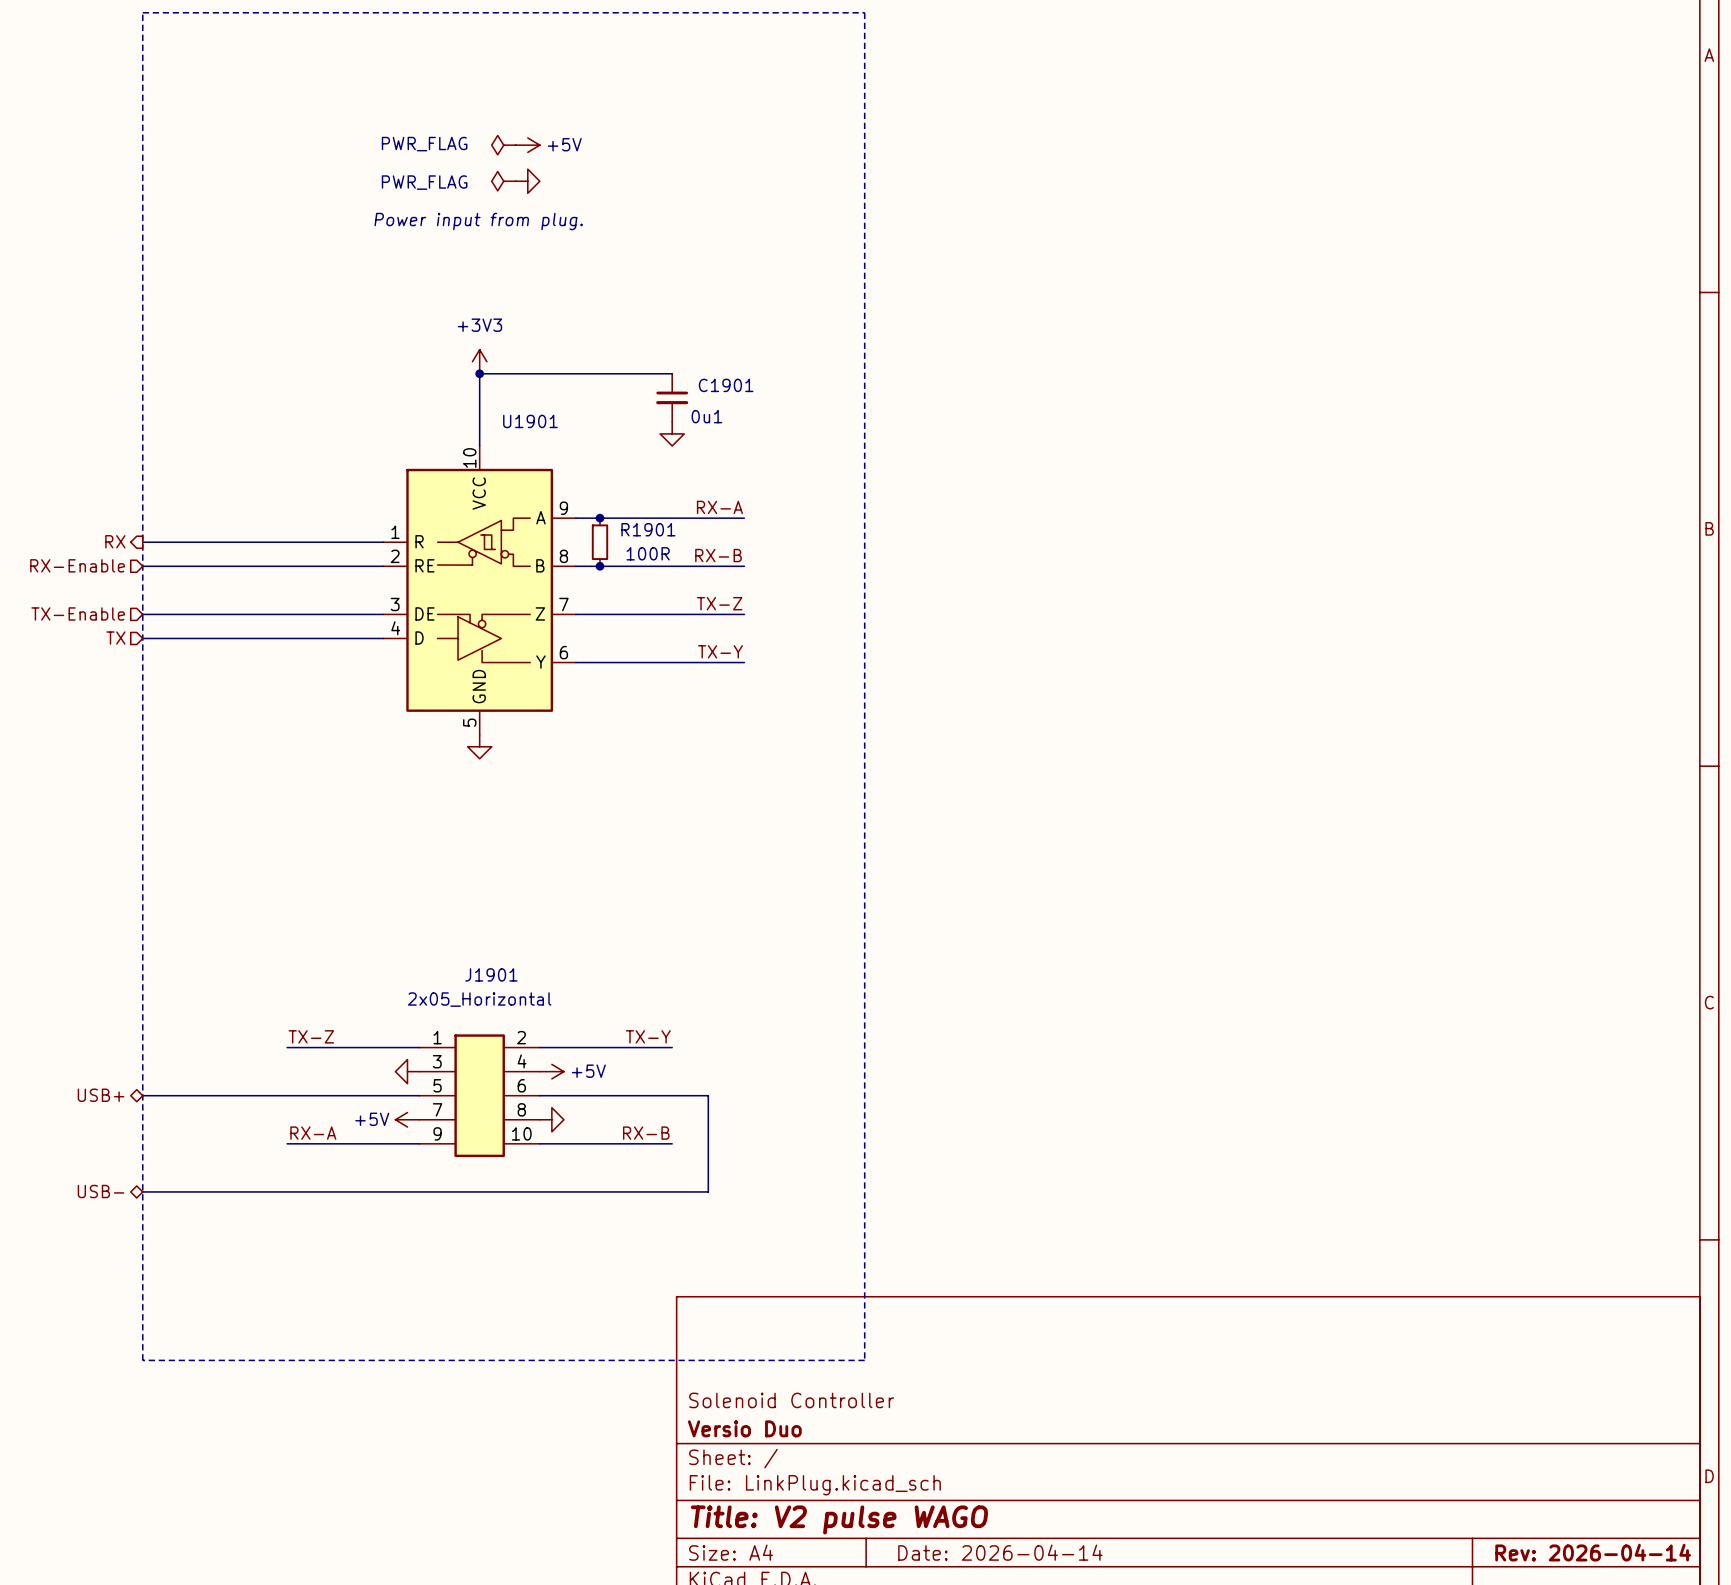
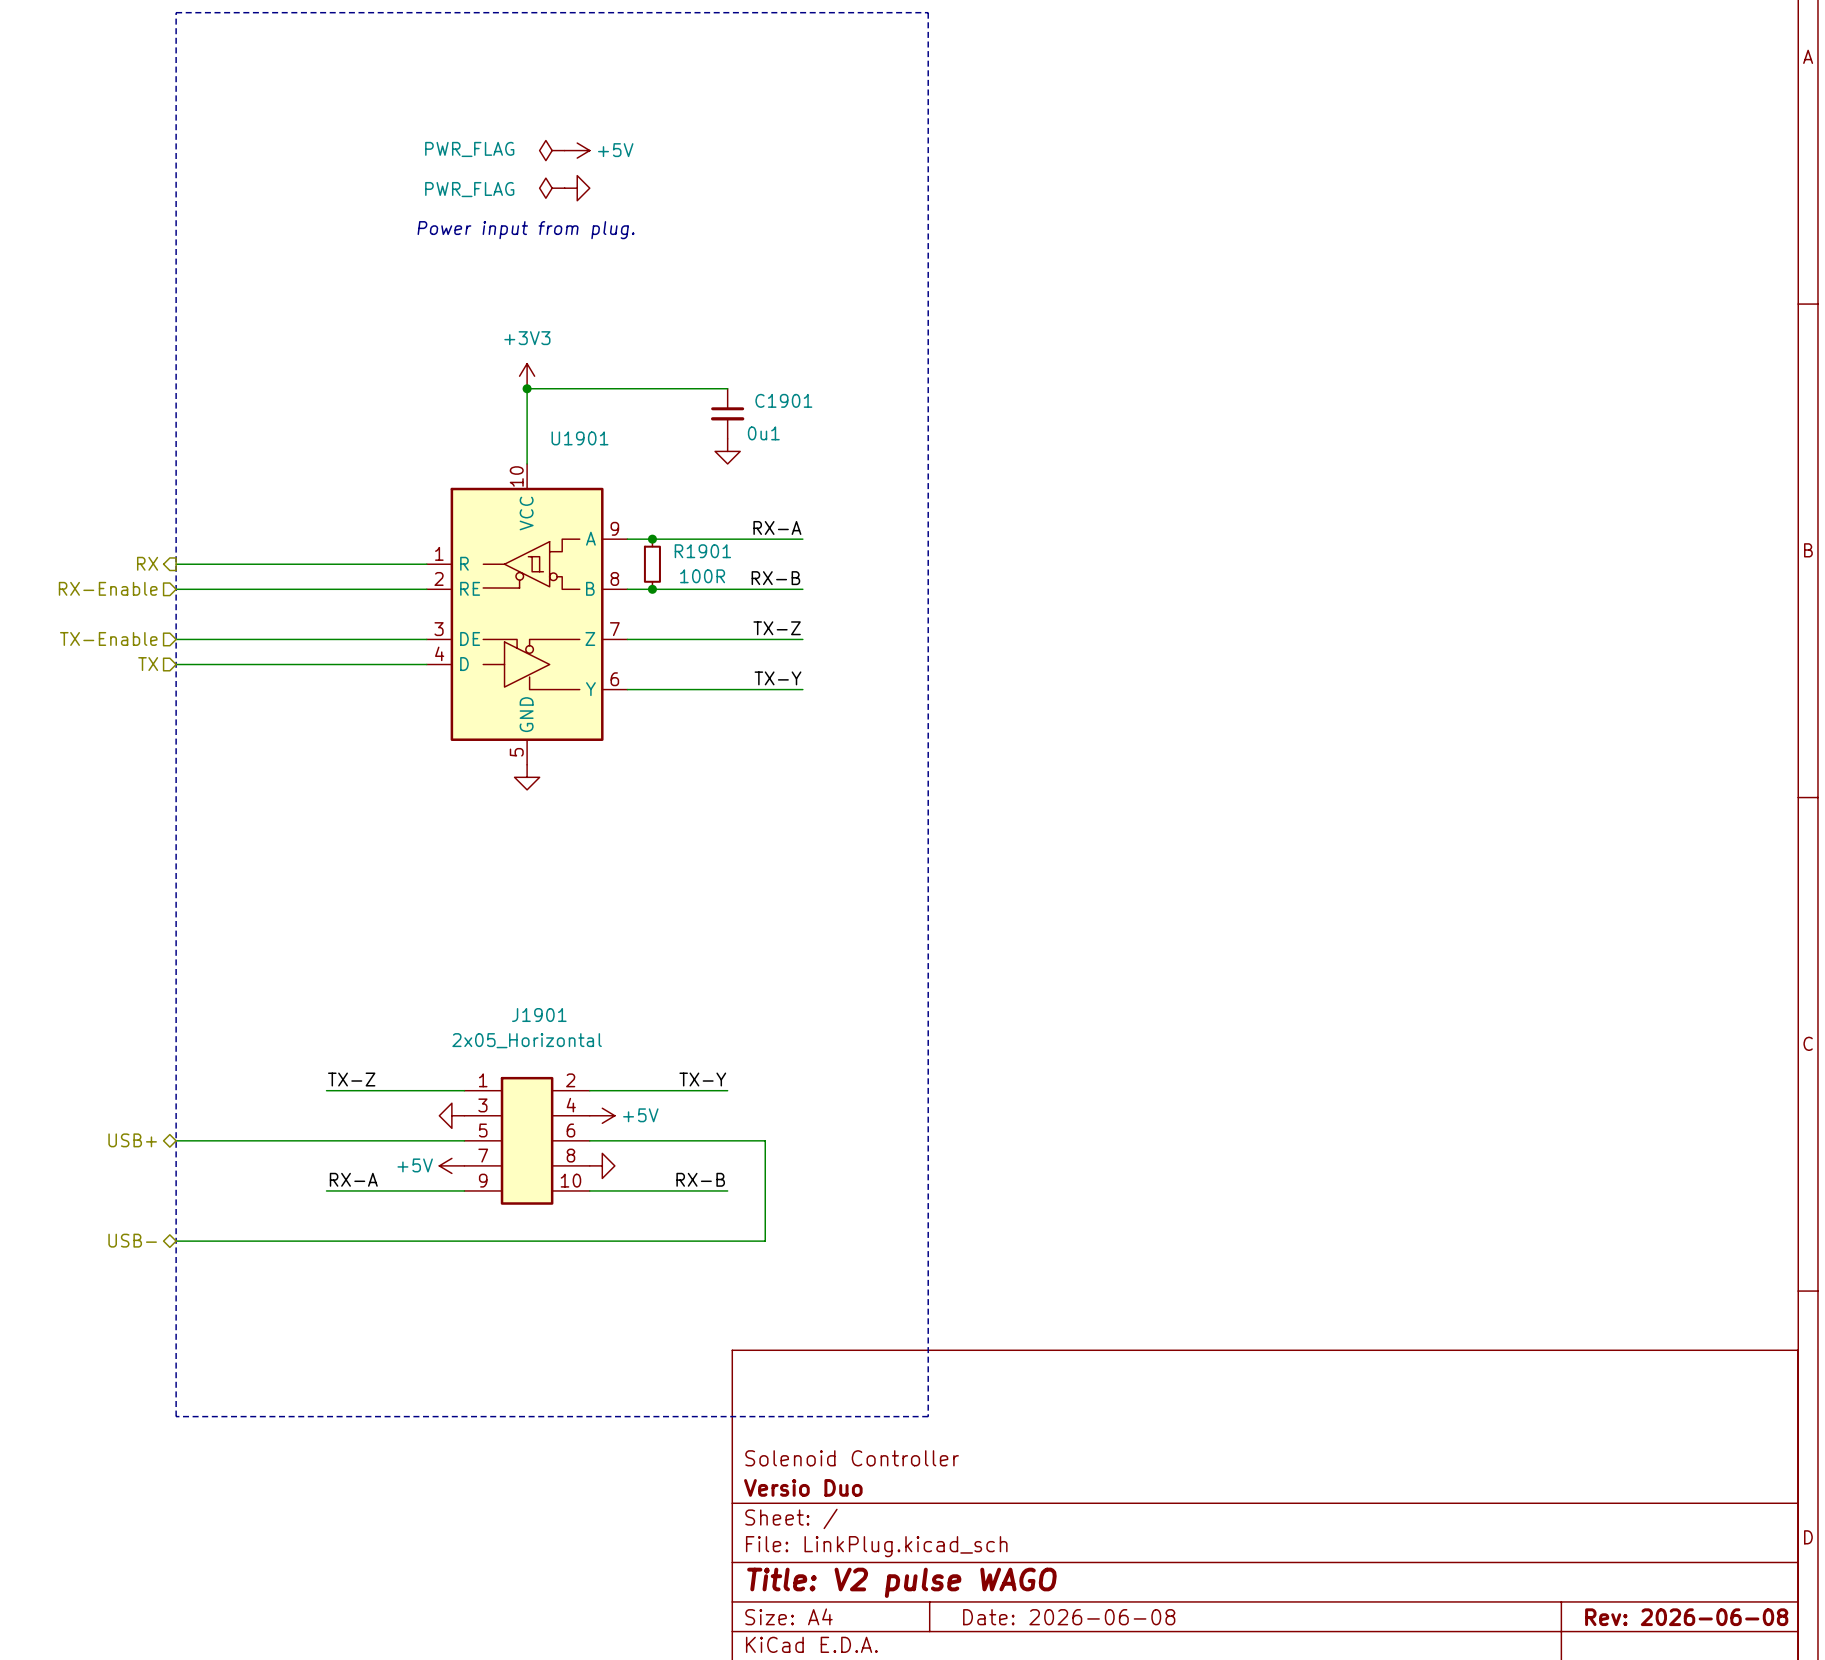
title block: Date: 2026-04-14 (1000, 1552) -> Date: 2026-06-08 (1069, 1617)
title block: Rev: 2026-04-14 (1593, 1552) -> Rev: 2026-06-08 (1686, 1617)

